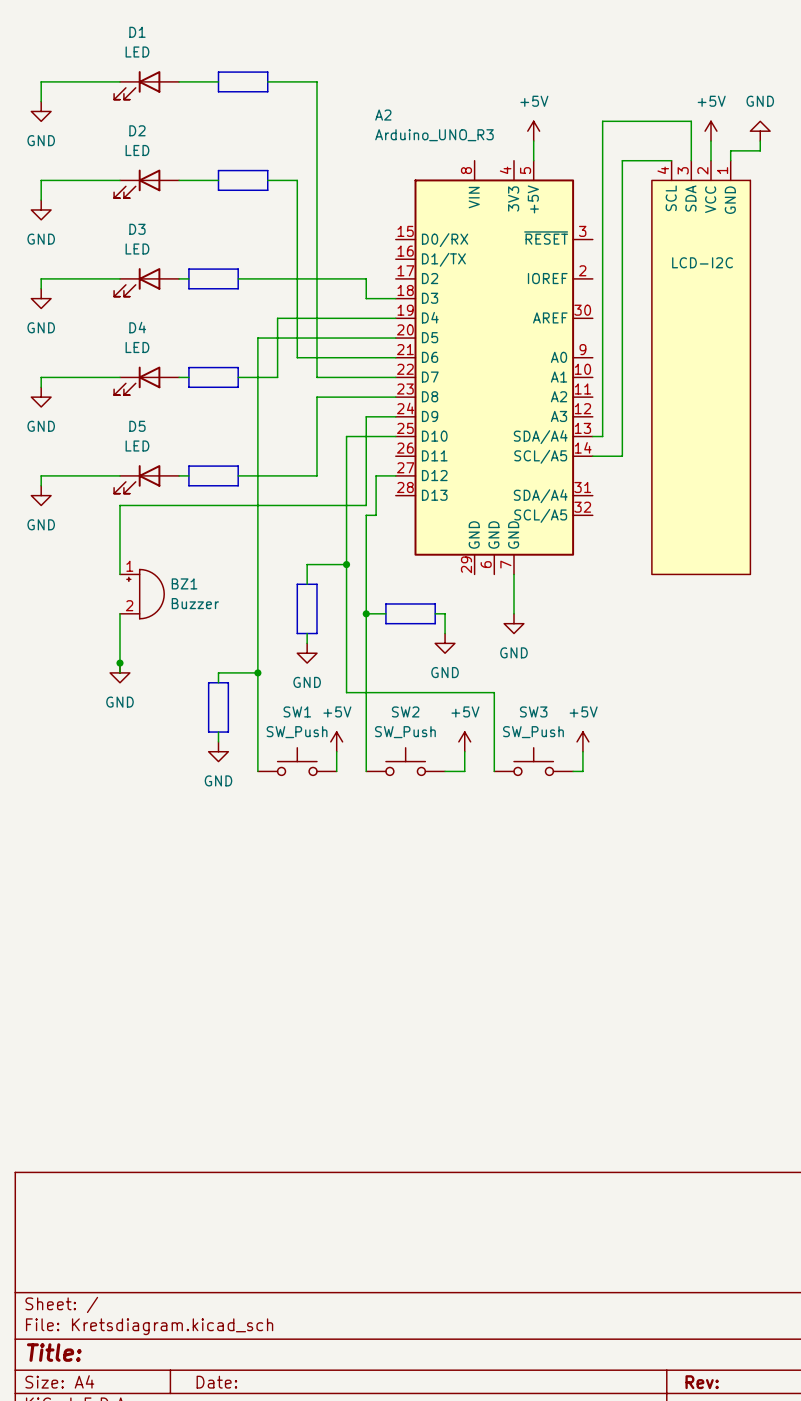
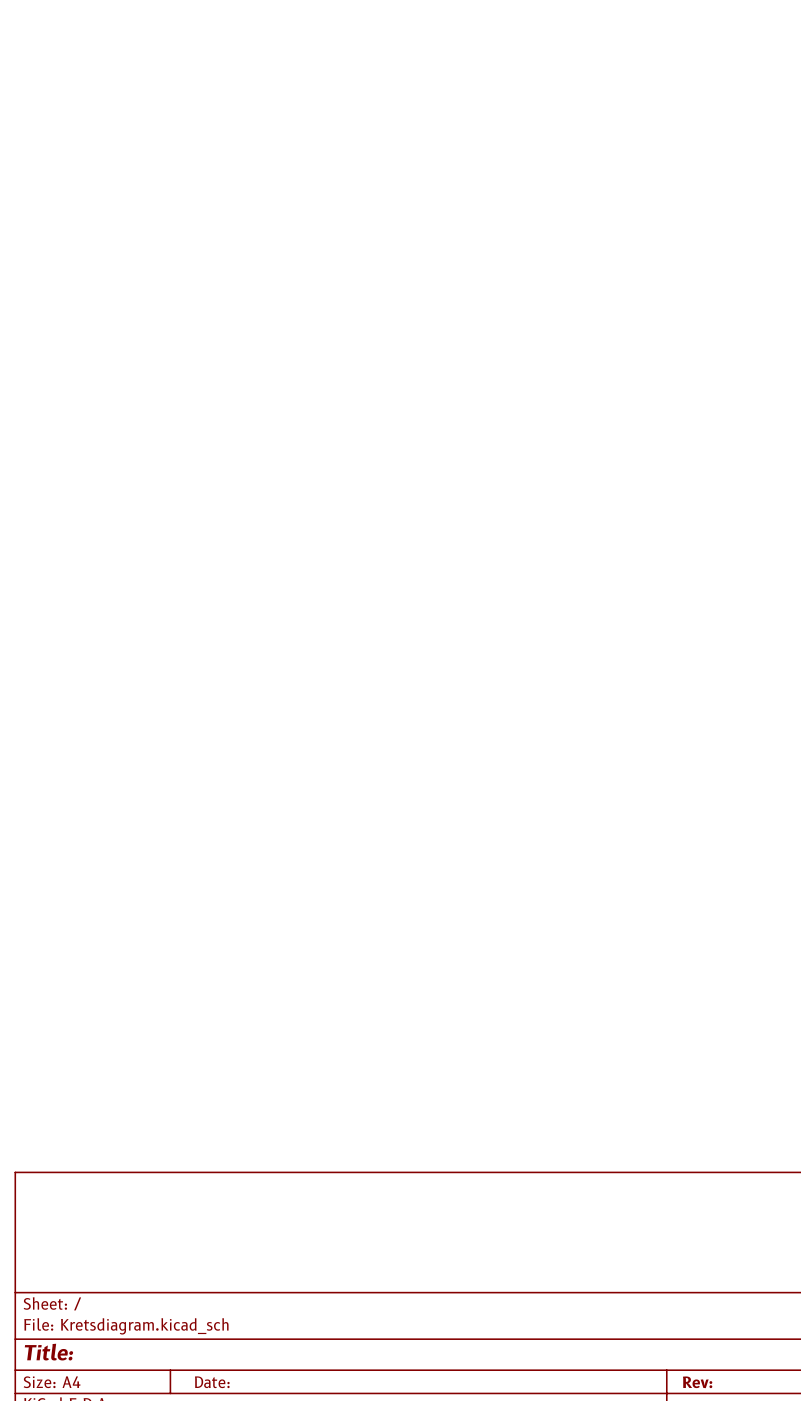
line: (218, 72) (218, 91) (267, 91) (267, 72) (218, 72) -> none
wire: (119, 81) (41, 81) (41, 101) -> none
wire: (179, 81) (218, 81) -> none
wire: (267, 81) (316, 81) (316, 377) (395, 377) -> none
D1: LED (146, 85) -> none
power symbol: GND (41, 111) -> none
power symbol: +5V (533, 131) -> none
power symbol: +5V (711, 131) -> none
power symbol: GND (760, 131) -> none
wire: (533, 141) (533, 160) -> none
wire: (711, 141) (711, 160) -> none
wire: (760, 141) (760, 150) (730, 150) (730, 160) -> none
wire: (671, 160) (622, 160) (622, 456) (592, 456) -> none
wire: (691, 160) (691, 121) (602, 121) (602, 436) (592, 436) -> none
line: (218, 170) (267, 170) (267, 190) (218, 190) (218, 170) -> none
wire: (119, 180) (41, 180) (41, 200) -> none
wire: (179, 180) (218, 180) -> none
wire: (267, 180) (297, 180) (297, 357) (395, 357) -> none
D2: LED (146, 183) -> none
power symbol: GND (41, 209) -> none
line: (188, 269) (188, 288) (238, 288) (238, 269) (188, 269) -> none
wire: (119, 278) (41, 278) (41, 288) -> none
wire: (179, 278) (188, 278) -> none
wire: (238, 278) (366, 278) (366, 298) (395, 298) -> none
D3: LED (146, 282) -> none
power symbol: GND (41, 298) -> none
wire: (395, 318) (277, 318) (277, 377) (238, 377) -> none
wire: (395, 338) (257, 338) (257, 771) -> none
line: (188, 367) (188, 387) (238, 387) (238, 367) (188, 367) -> none
A2: Arduino_UNO_R3 (494, 367) -> none
LCD-I2C: (701, 367) -> none
wire: (119, 377) (41, 377) (41, 387) -> none
wire: (179, 377) (188, 377) -> none
D4: LED (146, 380) -> none
power symbol: GND (41, 397) -> none
wire: (395, 397) (316, 397) (316, 475) (238, 475) -> none
wire: (395, 416) (366, 416) (366, 505) (119, 505) (119, 574) -> none
wire: (395, 436) (346, 436) (346, 692) (494, 692) (494, 771) -> none
line: (188, 466) (238, 466) (238, 485) (188, 485) (188, 466) -> none
wire: (119, 475) (41, 475) (41, 485) -> none
wire: (179, 475) (188, 475) -> none
wire: (395, 475) (376, 475) (376, 515) (366, 515) (366, 771) -> none
D5: LED (146, 479) -> none
power symbol: GND (41, 495) -> none
wire: (346, 564) (307, 564) (307, 584) -> none
junction: (346, 564) -> none
wire: (513, 574) (513, 613) -> none
line: (297, 584) (316, 584) (316, 633) (297, 633) (297, 584) -> none
BZ1: Buzzer (142, 594) -> none
line: (385, 603) (435, 603) (435, 623) (385, 623) (385, 603) -> none
wire: (119, 613) (119, 672) -> none
wire: (366, 613) (385, 613) -> none
junction: (366, 613) -> none
wire: (435, 613) (445, 613) (445, 633) -> none
power symbol: GND (513, 623) -> none
wire: (307, 633) (307, 643) -> none
power symbol: GND (445, 643) -> none
power symbol: GND (307, 653) -> none
junction: (119, 663) -> none
power symbol: GND (119, 672) -> none
wire: (257, 672) (218, 672) (218, 682) -> none
junction: (257, 672) -> none
line: (208, 682) (228, 682) (228, 732) (208, 732) (208, 682) -> none
wire: (218, 732) (218, 741) -> none
power symbol: +5V (336, 741) -> none
power symbol: +5V (464, 741) -> none
power symbol: +5V (582, 741) -> none
power symbol: GND (218, 751) -> none
wire: (336, 751) (336, 771) -> none
wire: (464, 751) (464, 771) (445, 771) -> none
wire: (582, 751) (582, 771) (573, 771) -> none
SW1: SW_Push (297, 761) -> none
SW2: SW_Push (405, 761) -> none
SW3: SW_Push (533, 761) -> none

